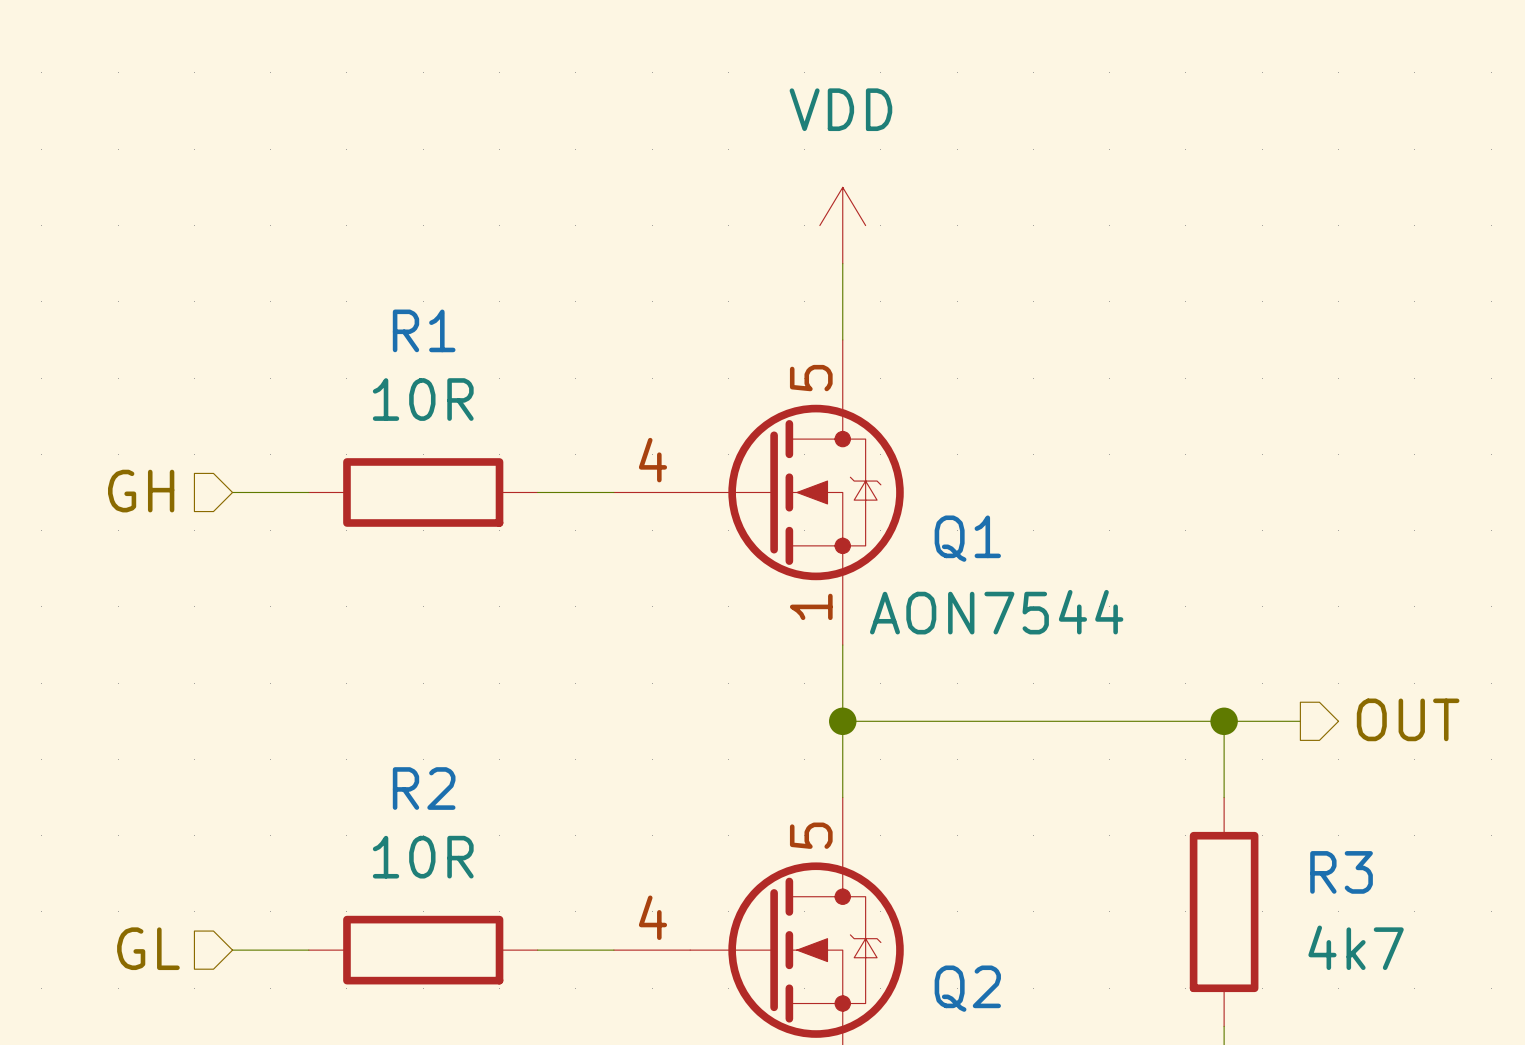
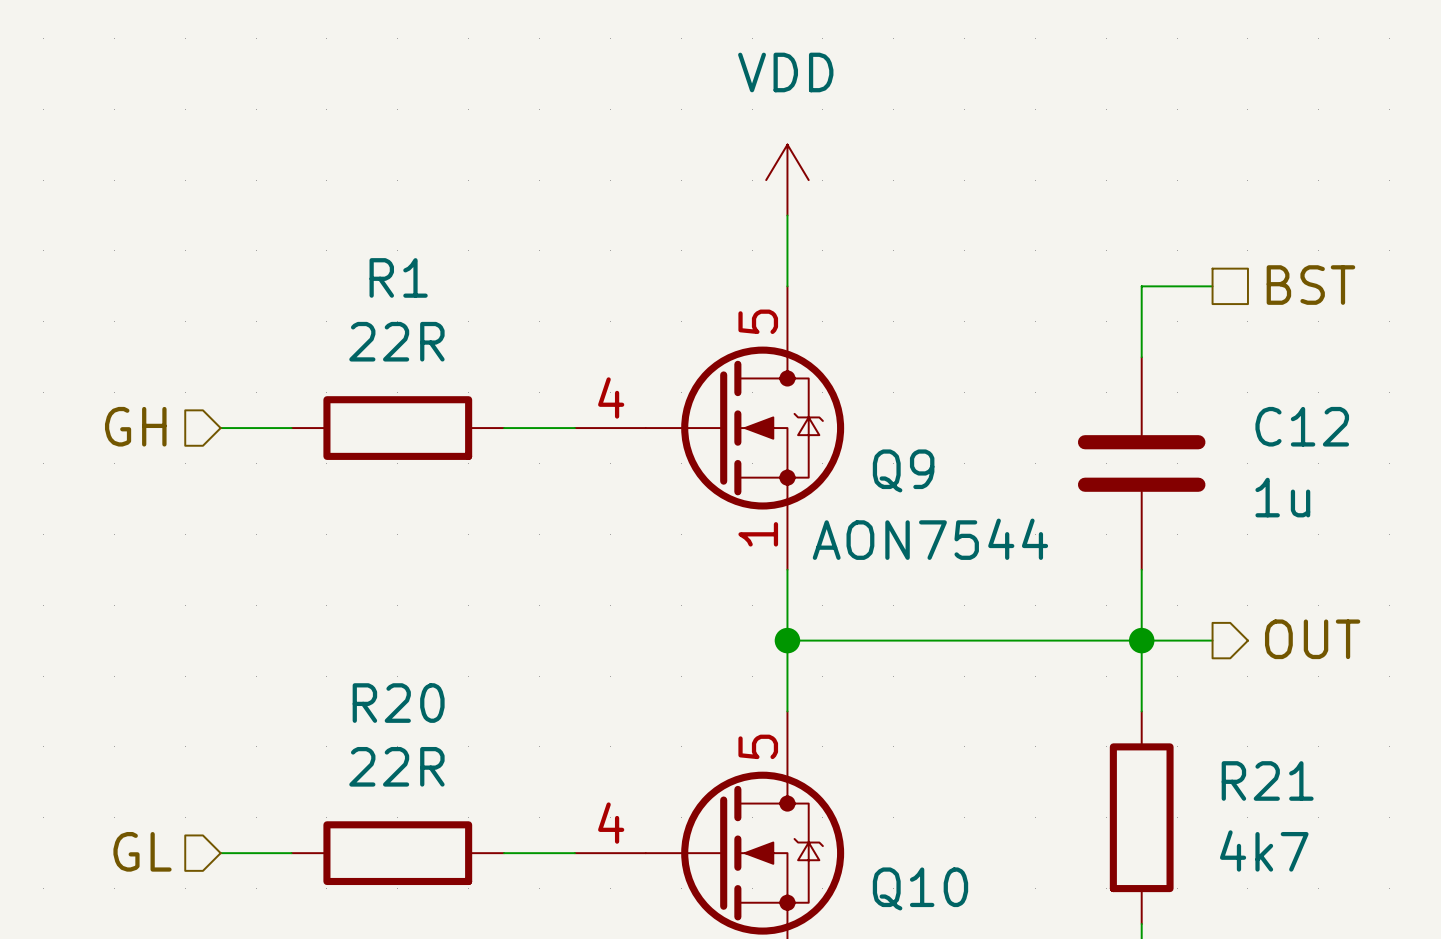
hierarchical label: none -> BST (1310, 285)
wire: none -> (1212, 286) (1141, 286) (1141, 357)
R1 value: 10R (423, 399) -> 22R (396, 341)
C12: none -> 1u (1141, 463)
Q1 name: Q1 (967, 538) -> Q9 (903, 470)
wire: none -> (1141, 569) (1141, 640)
R2 name: R2 (424, 788) -> R20 (398, 703)
R2 value: 10R (423, 857) -> 22R (396, 766)
R3 name: R3 (1341, 872) -> R21 (1267, 780)
Q2 name: Q2 (967, 988) -> Q10 (920, 888)

